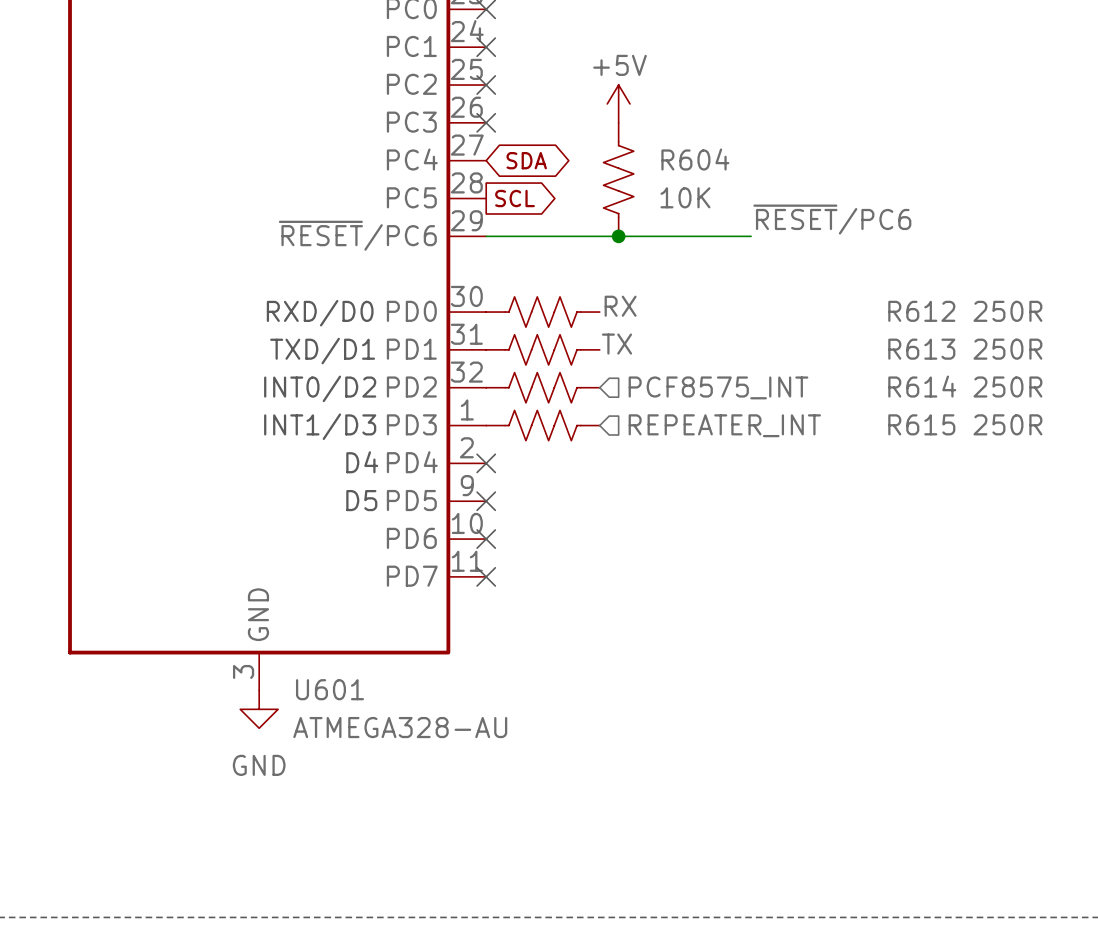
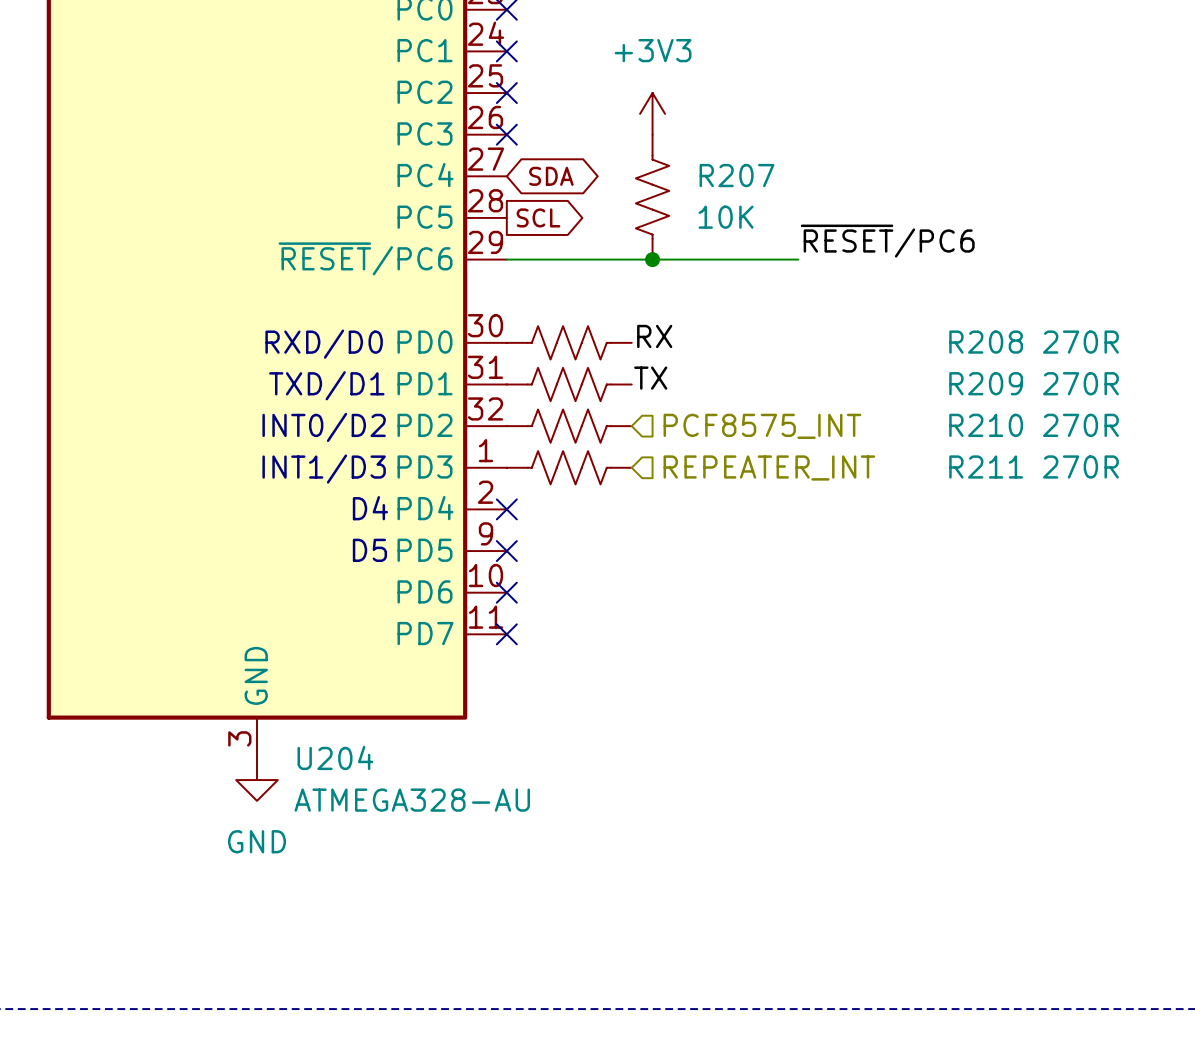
power symbol: +5V (618, 103) -> +3V3 (652, 113)
R604 name: R604 (695, 159) -> R207 (736, 175)
R612 name: R612 (921, 311) -> R208 (986, 342)
R612 value: 250R (1007, 311) -> 270R (1080, 342)
R613 name: R613 (921, 349) -> R209 (986, 383)
R613 value: 250R (1007, 349) -> 270R (1080, 383)
R614 name: R614 (922, 386) -> R210 (986, 425)
R614 value: 250R (1007, 387) -> 270R (1080, 425)
R615 name: R615 (921, 424) -> R211 (986, 466)
R615 value: 250R (1007, 424) -> 270R (1080, 466)
U601 name: U601 (329, 689) -> U204 (335, 757)

